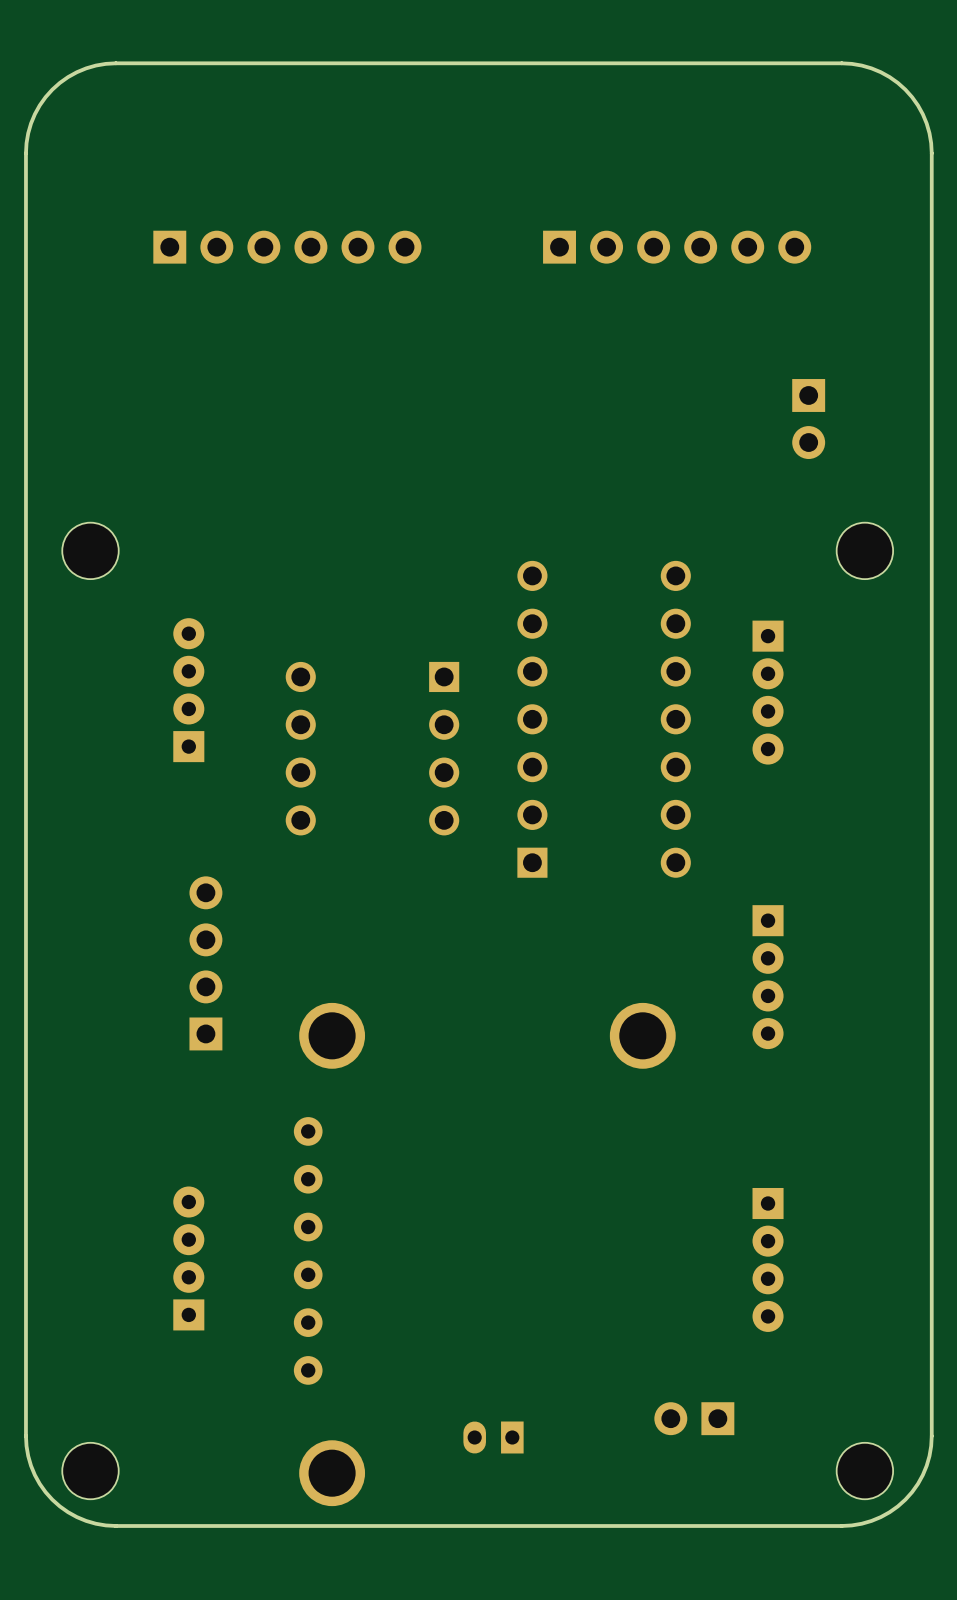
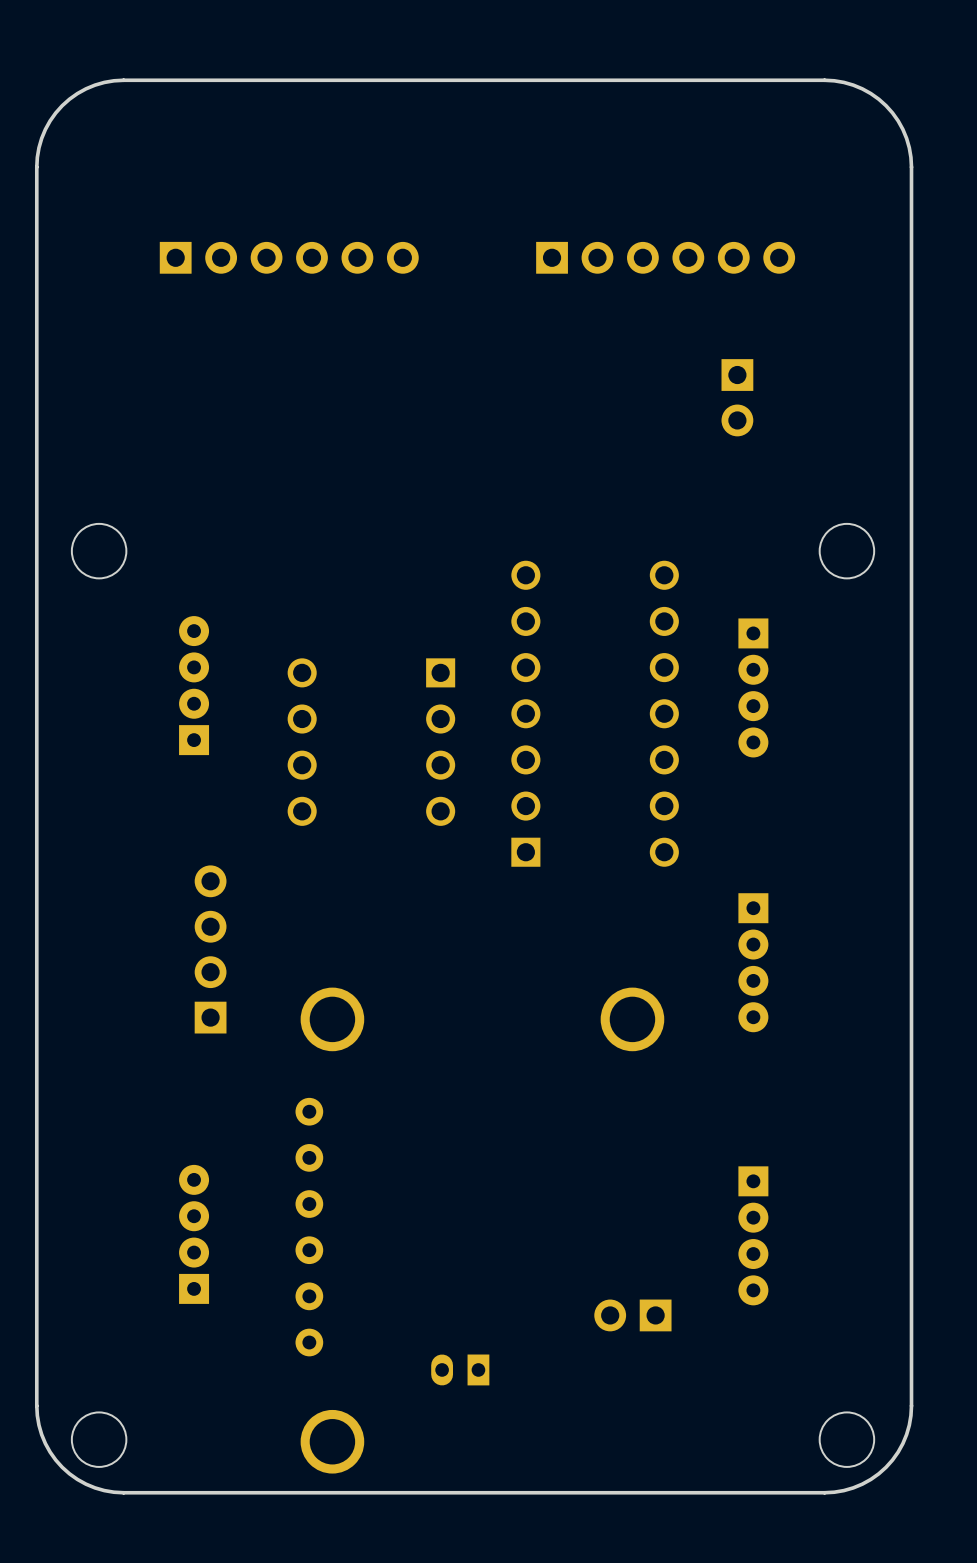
part position: (808, 419) -> (737, 397)
part position: (694, 1418) -> (632, 1315)
part position: (493, 1437) -> (460, 1369)

